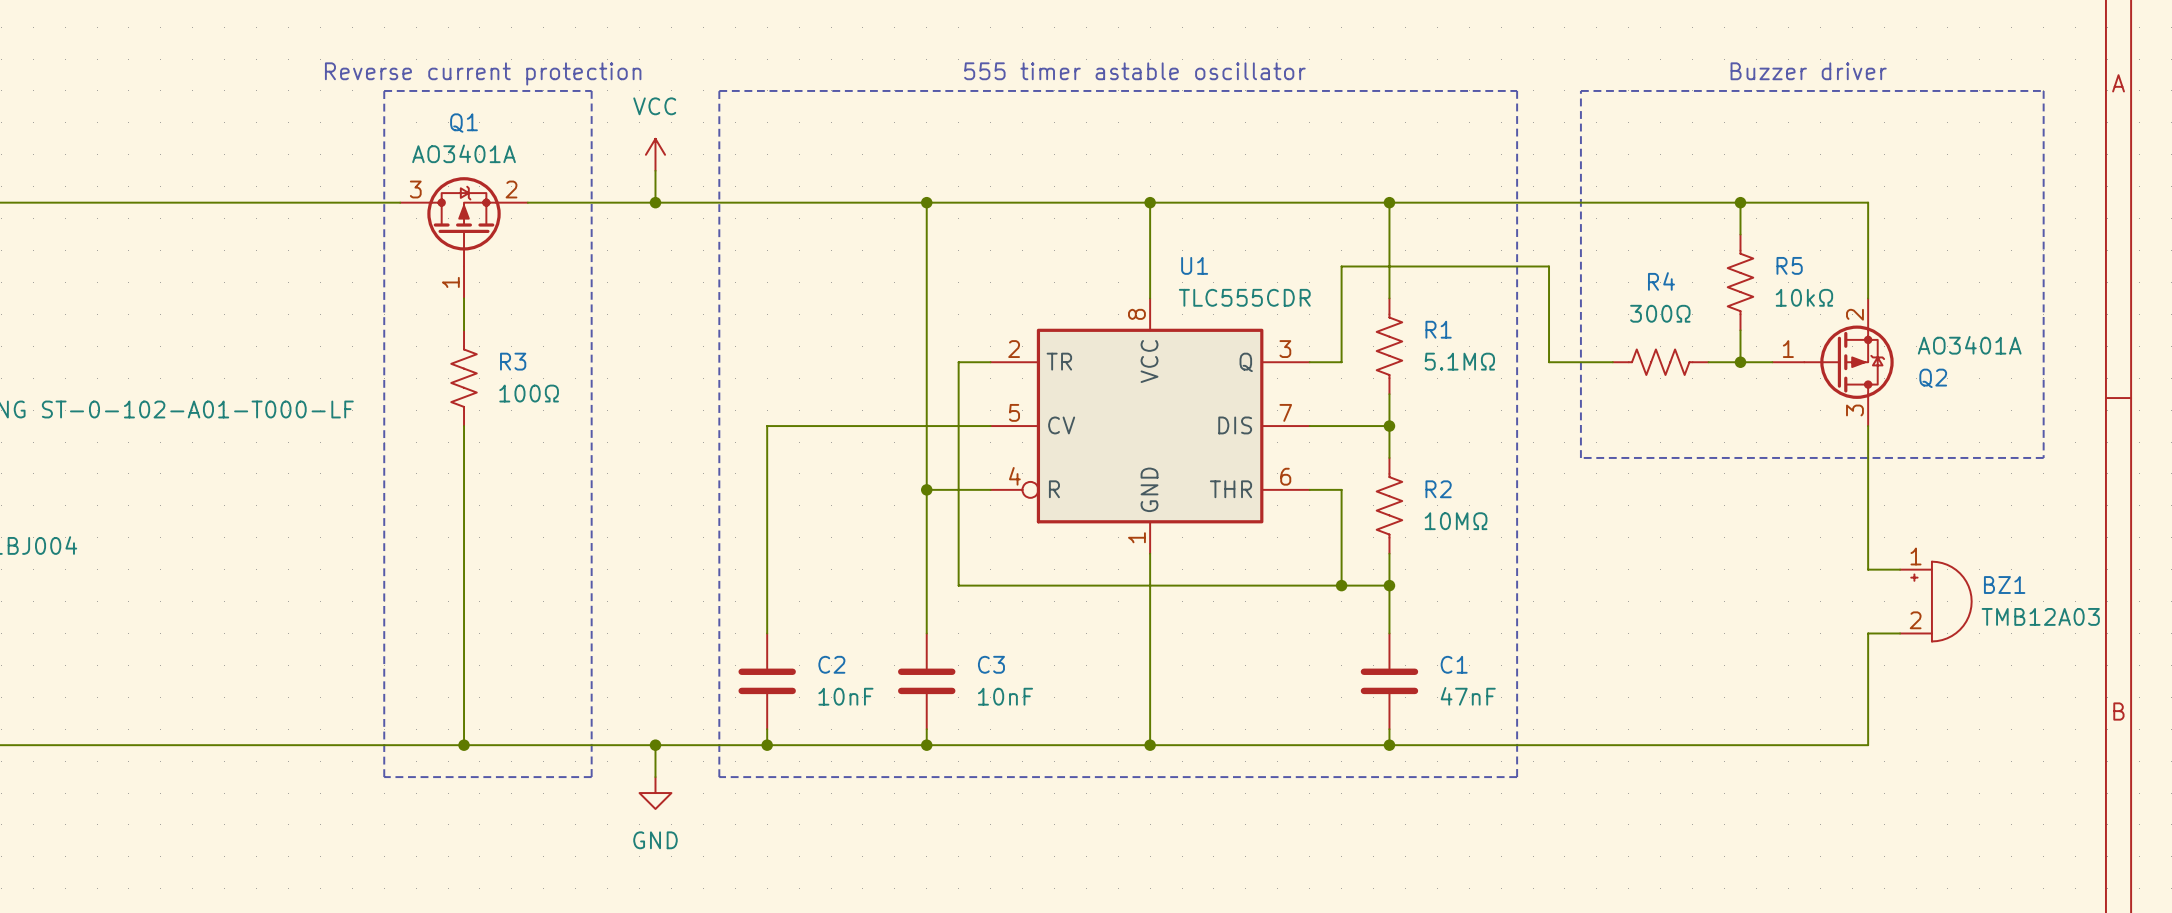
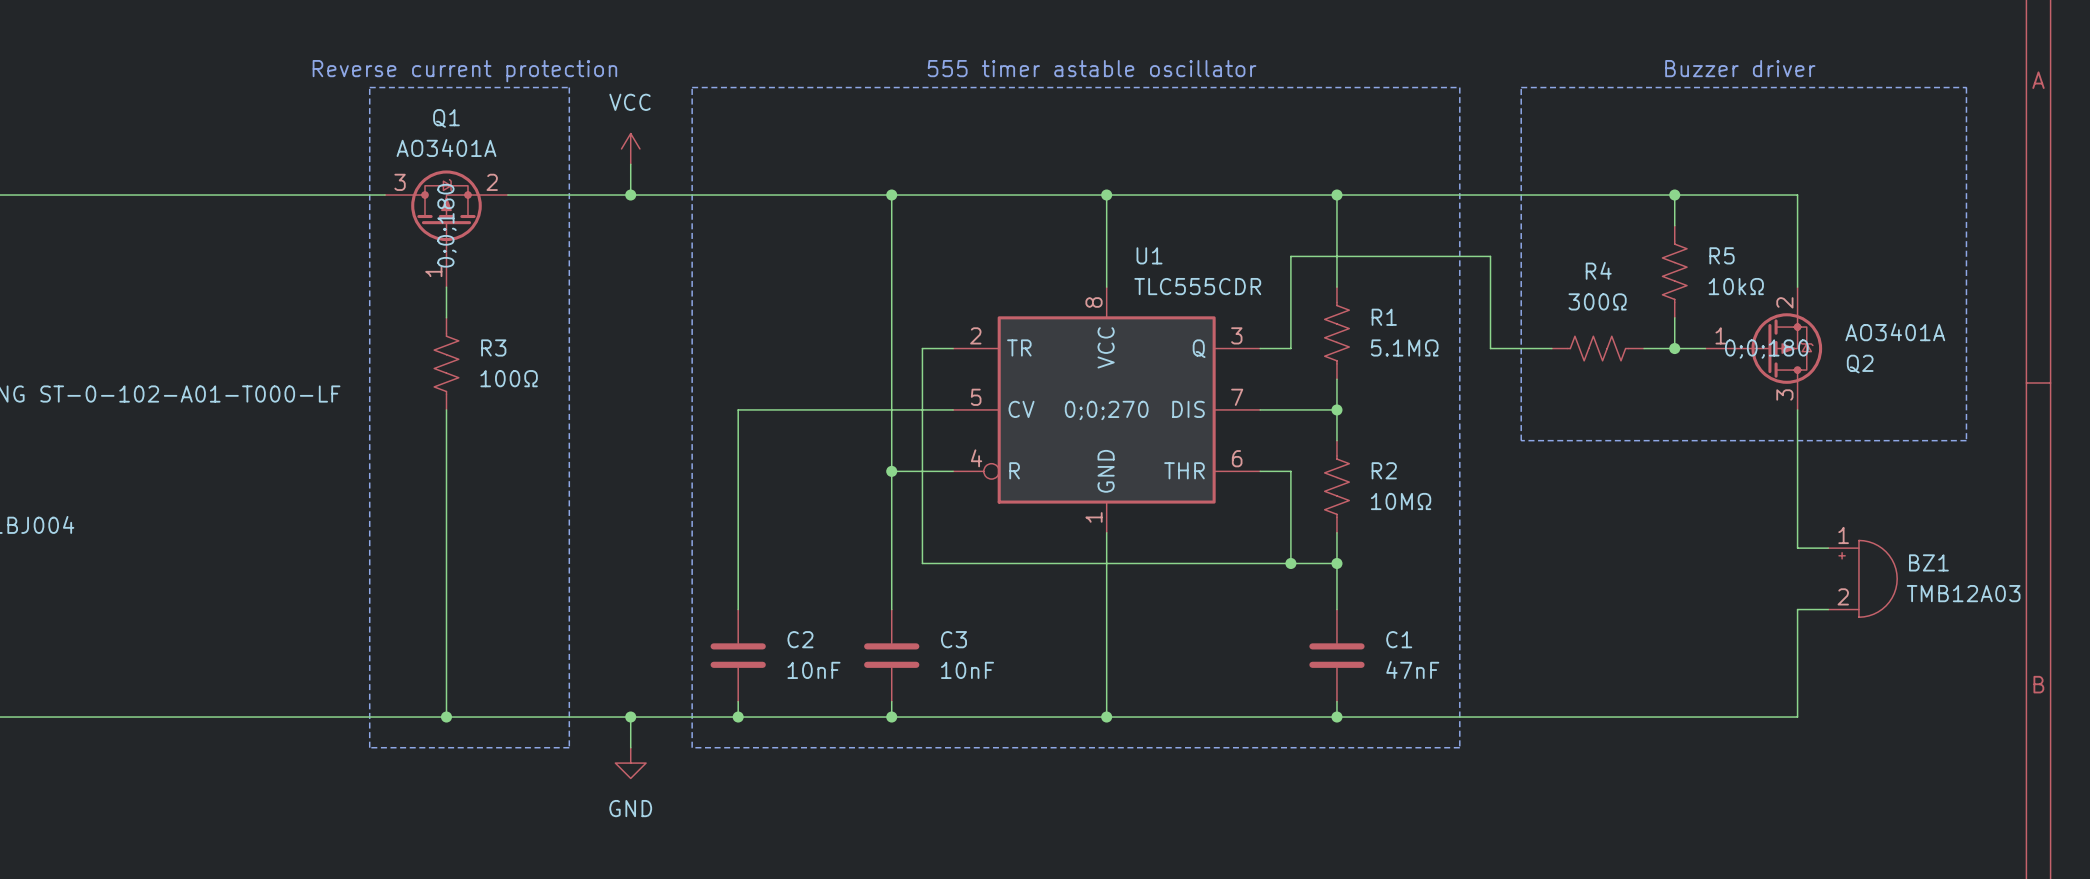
Q1 text: none -> 0;0;180 (447, 225)
Q2 text: none -> 0;0;180 (1766, 349)
U1 text: none -> 0;0;270 (1106, 410)

